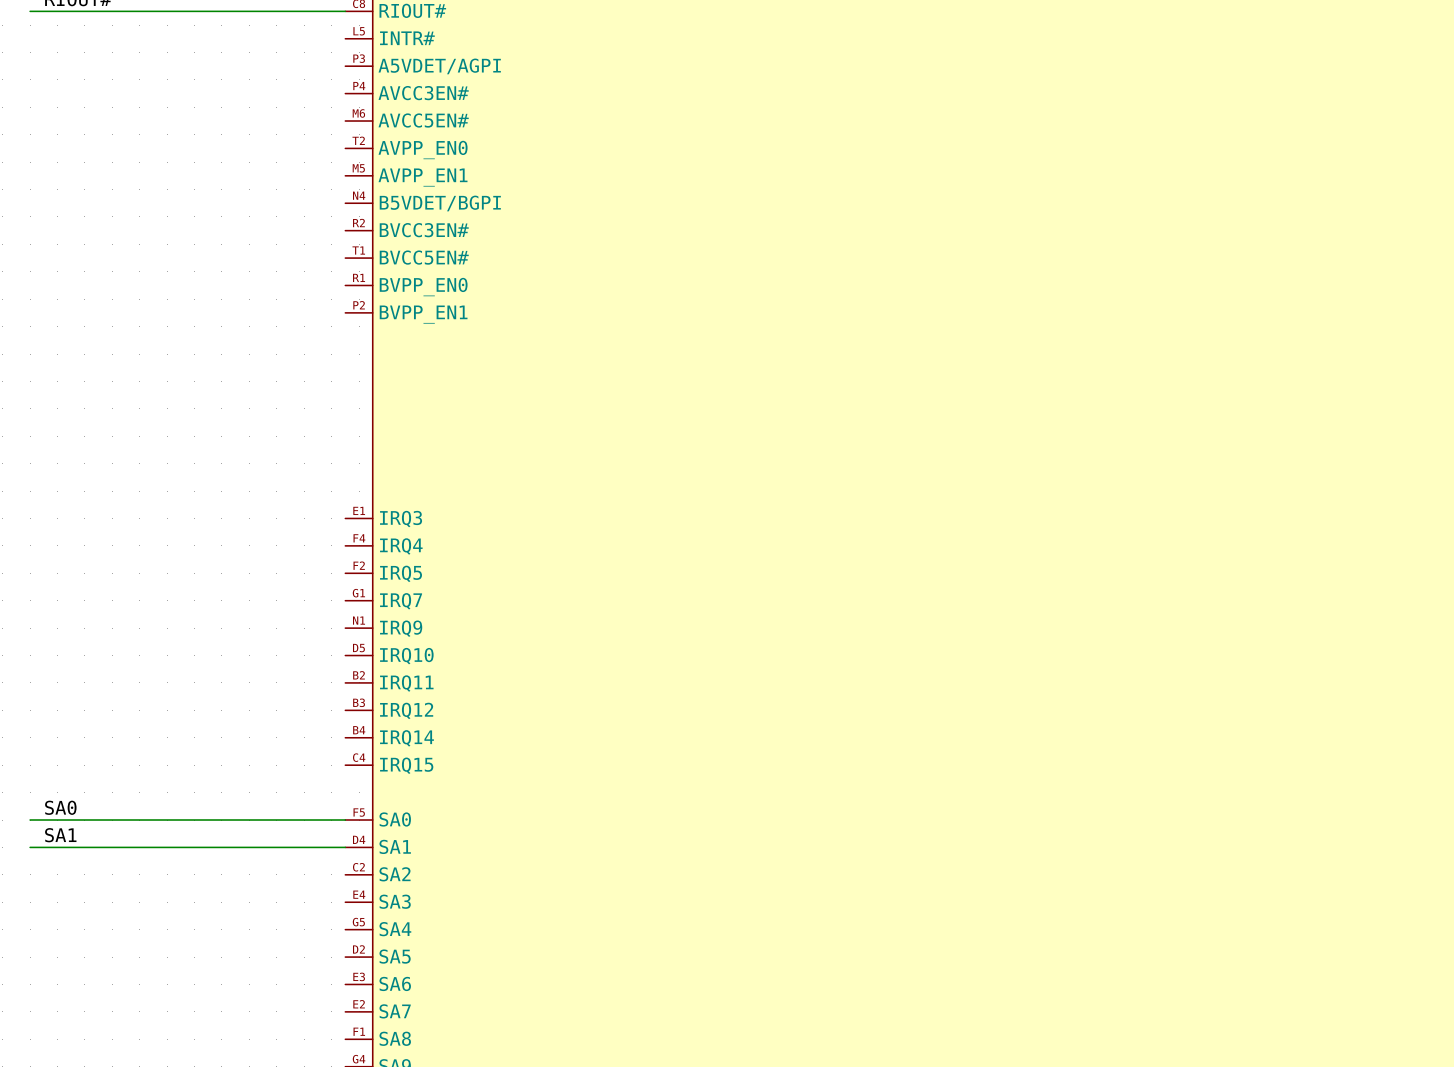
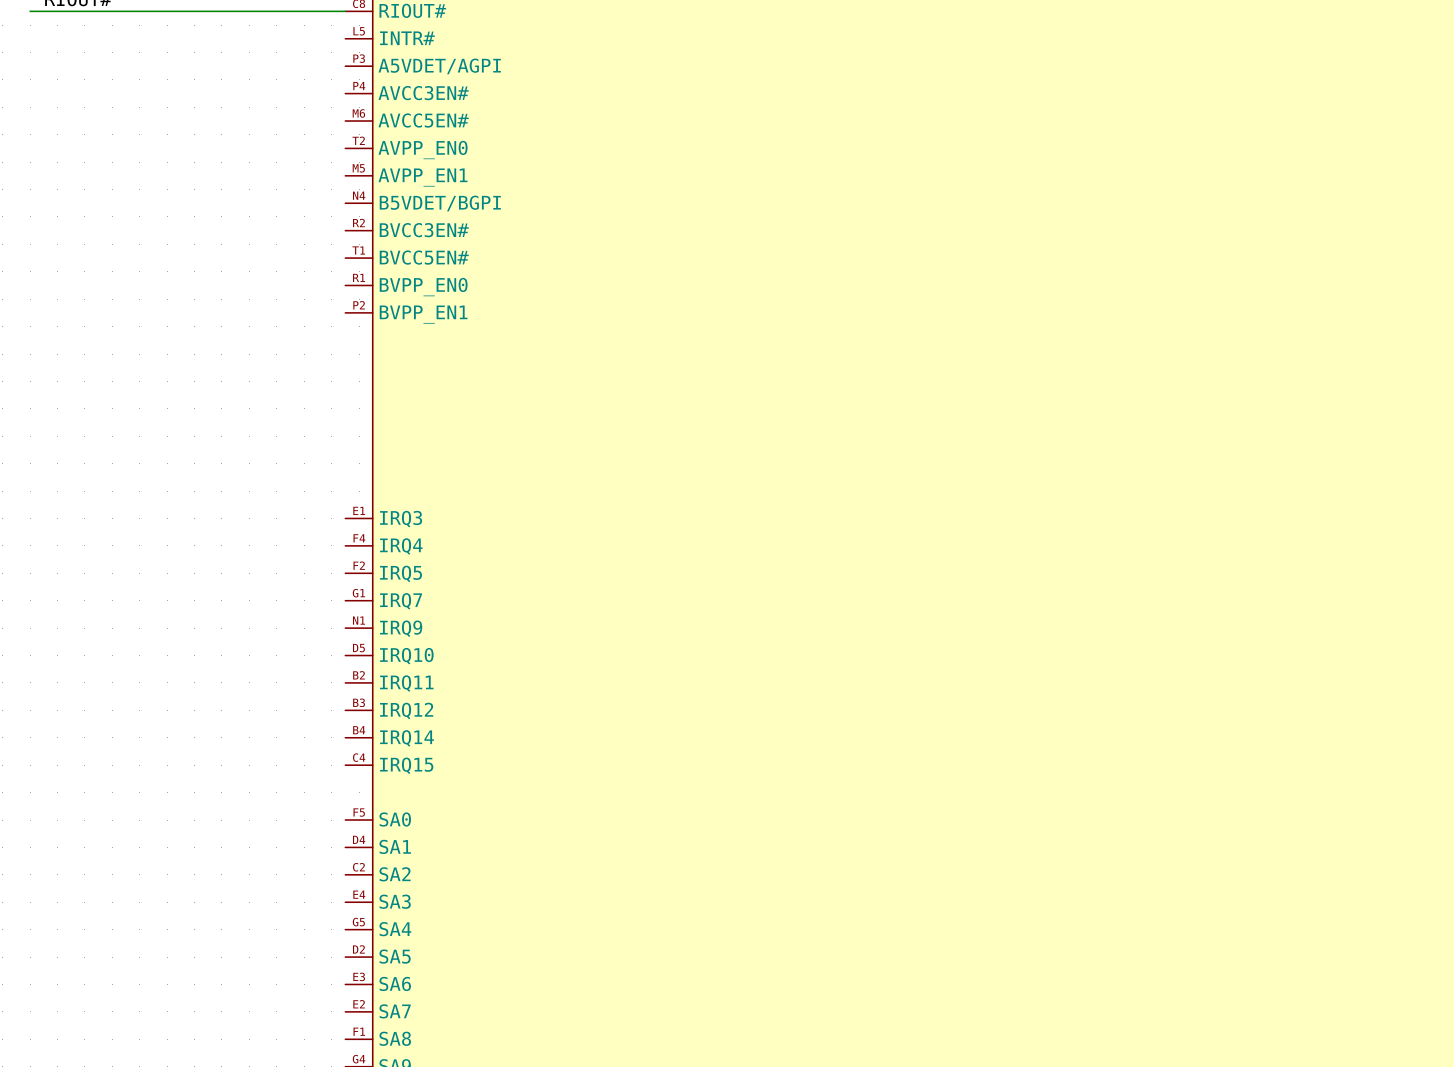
label: SA0 (60, 807) -> none
wire: (30, 820) (345, 820) -> none
label: SA1 (60, 835) -> none
wire: (30, 847) (345, 847) -> none

